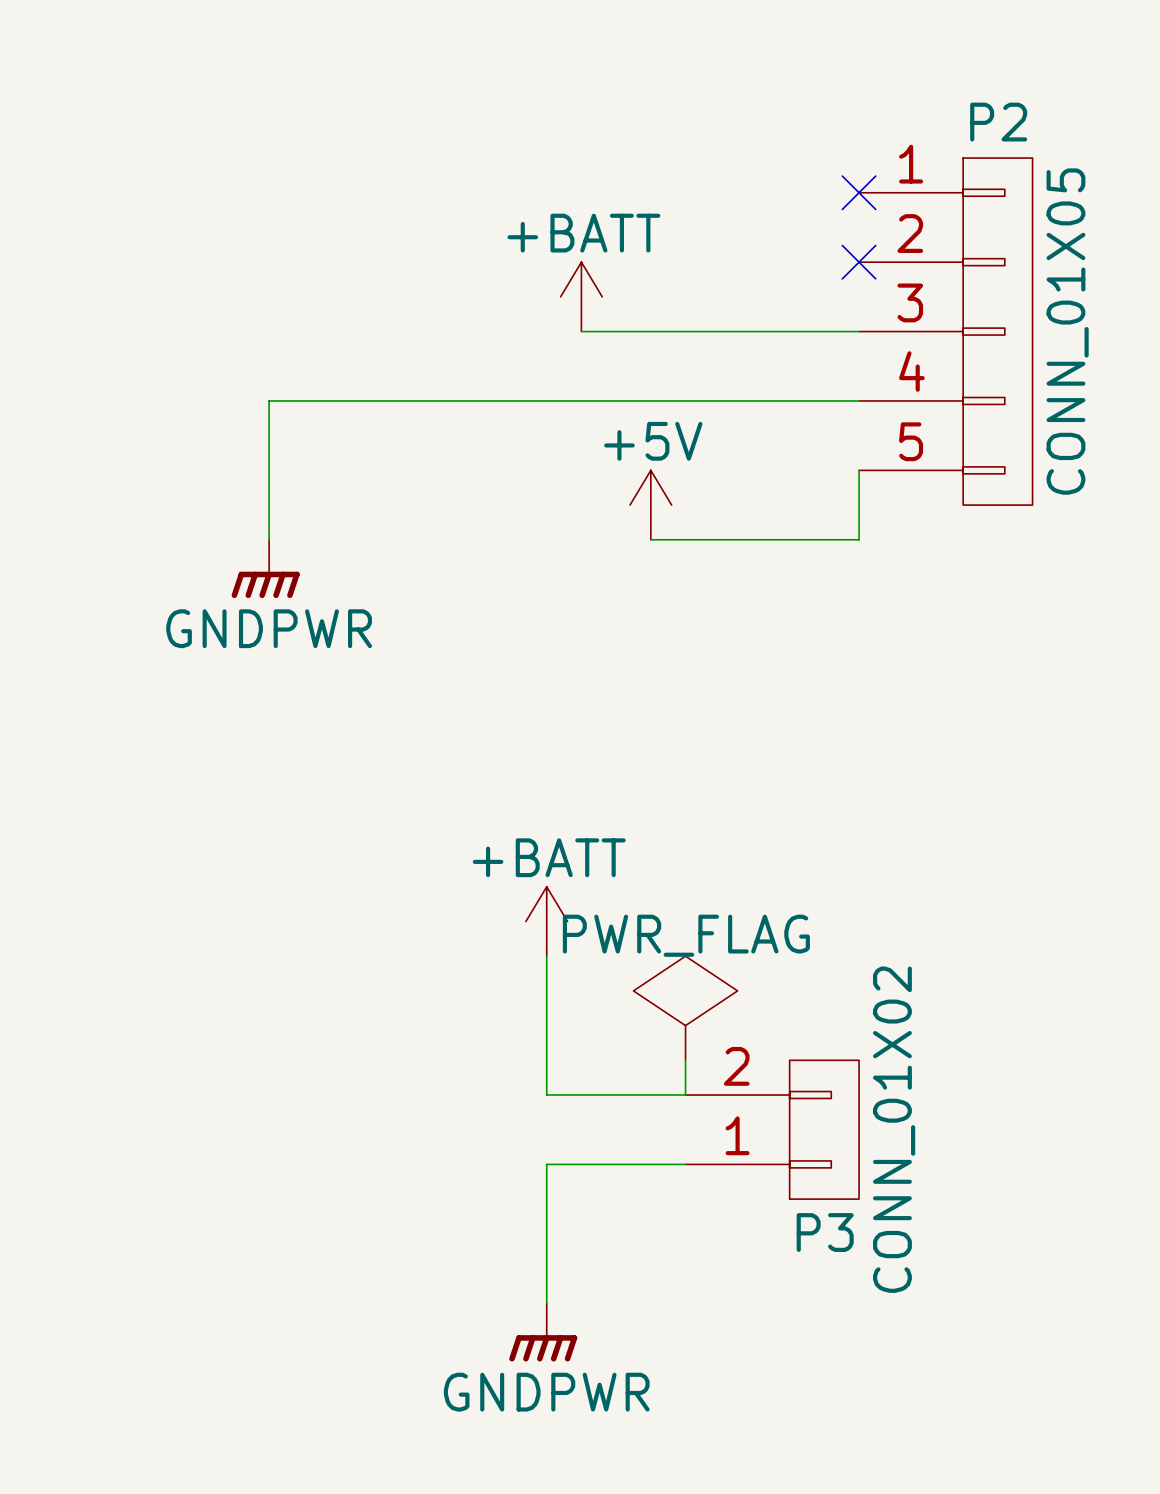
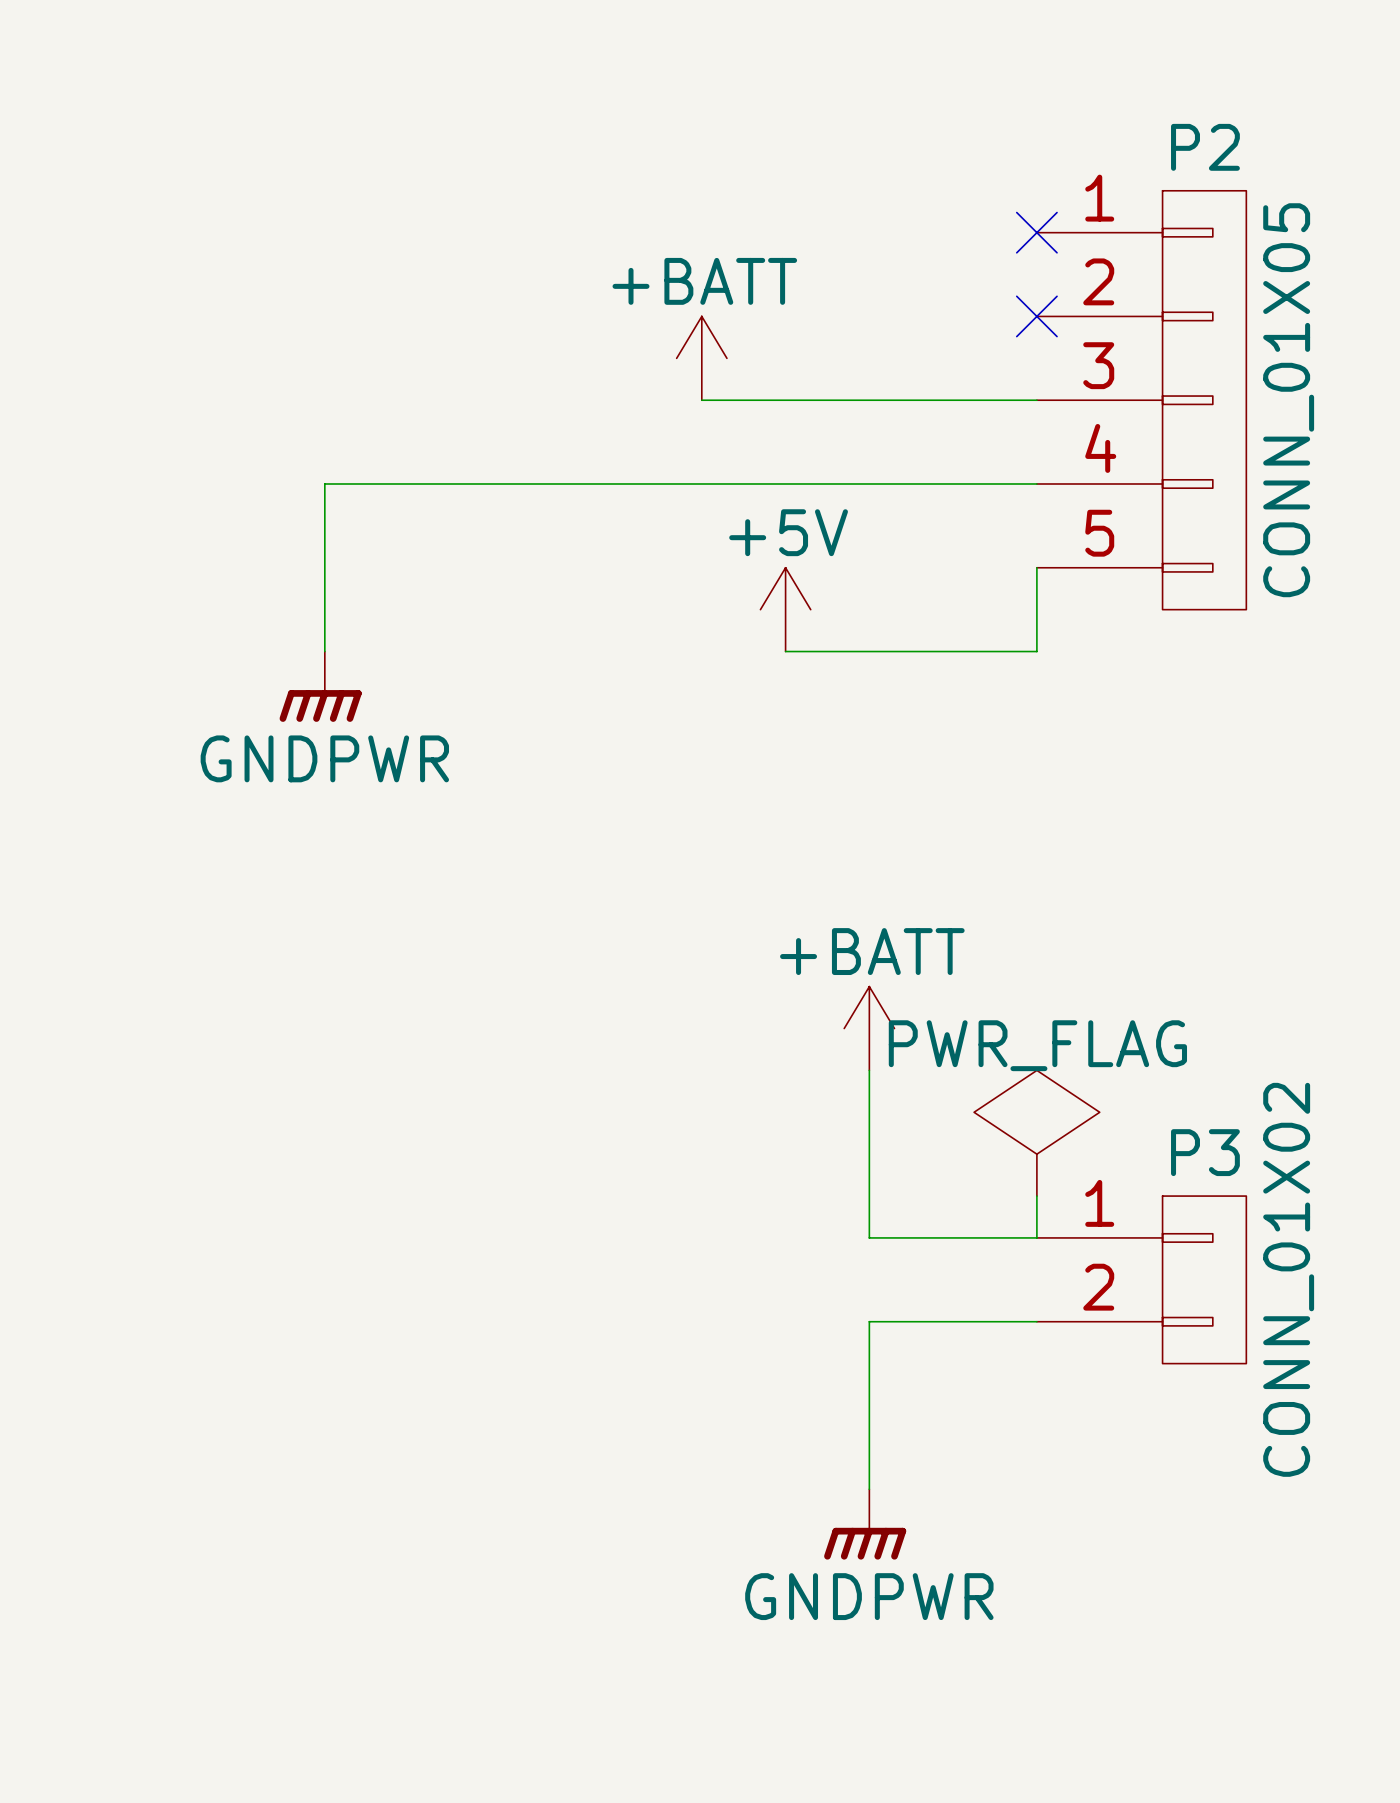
power symbol position: +BATT (546, 921) -> +BATT (869, 1028)
wire: (546, 956) (546, 1095) (685, 1095) (685, 1060) -> (869, 1070) (869, 1237) (1036, 1237) (1036, 1196)
power symbol position: PWR_FLAG (685, 1008) -> PWR_FLAG (1036, 1133)
P3 position: (772, 1129) -> (1141, 1279)
P3 flip: as is (824, 1129) -> up-down (1204, 1279)
wire: (685, 1164) (546, 1164) (546, 1303) -> (1036, 1321) (869, 1321) (869, 1489)
power symbol position: GNDPWR (543, 1332) -> GNDPWR (865, 1524)

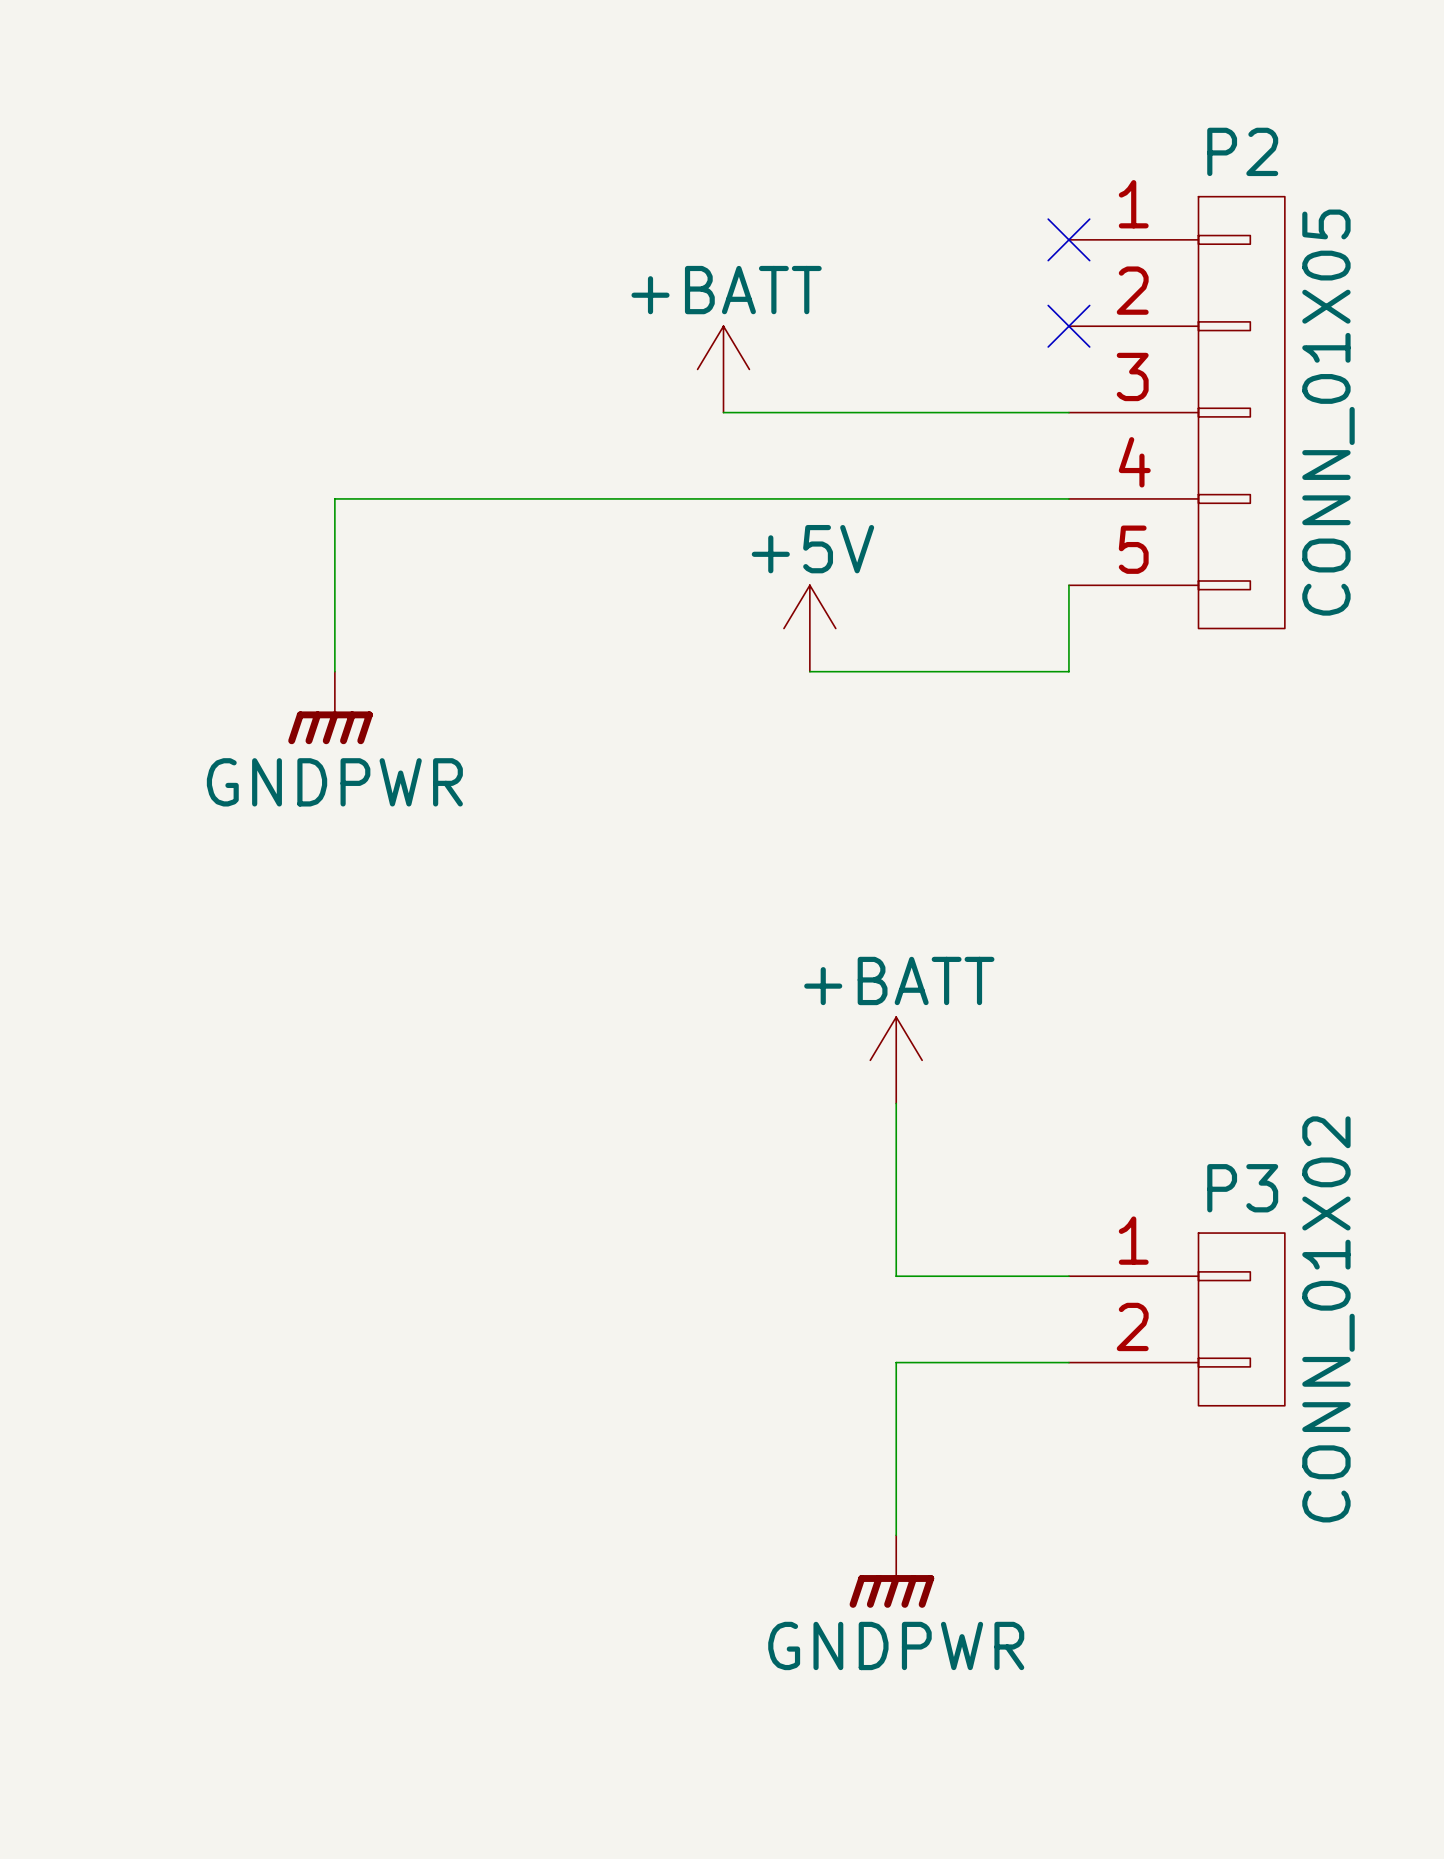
power symbol: PWR_FLAG (1036, 1133) -> none
wire: (1036, 1196) (1036, 1237) -> none

